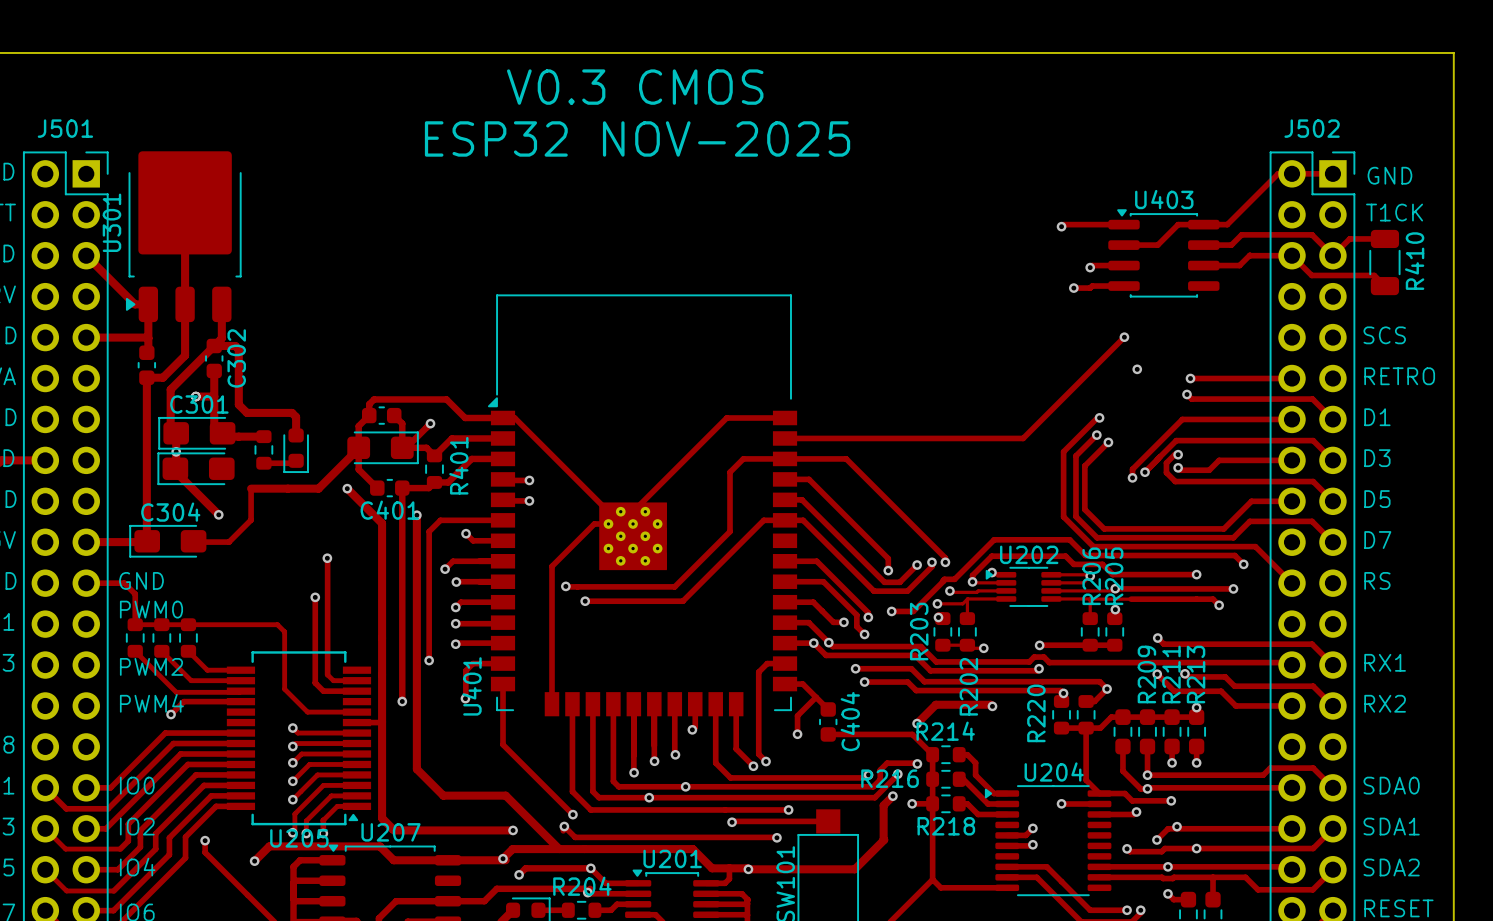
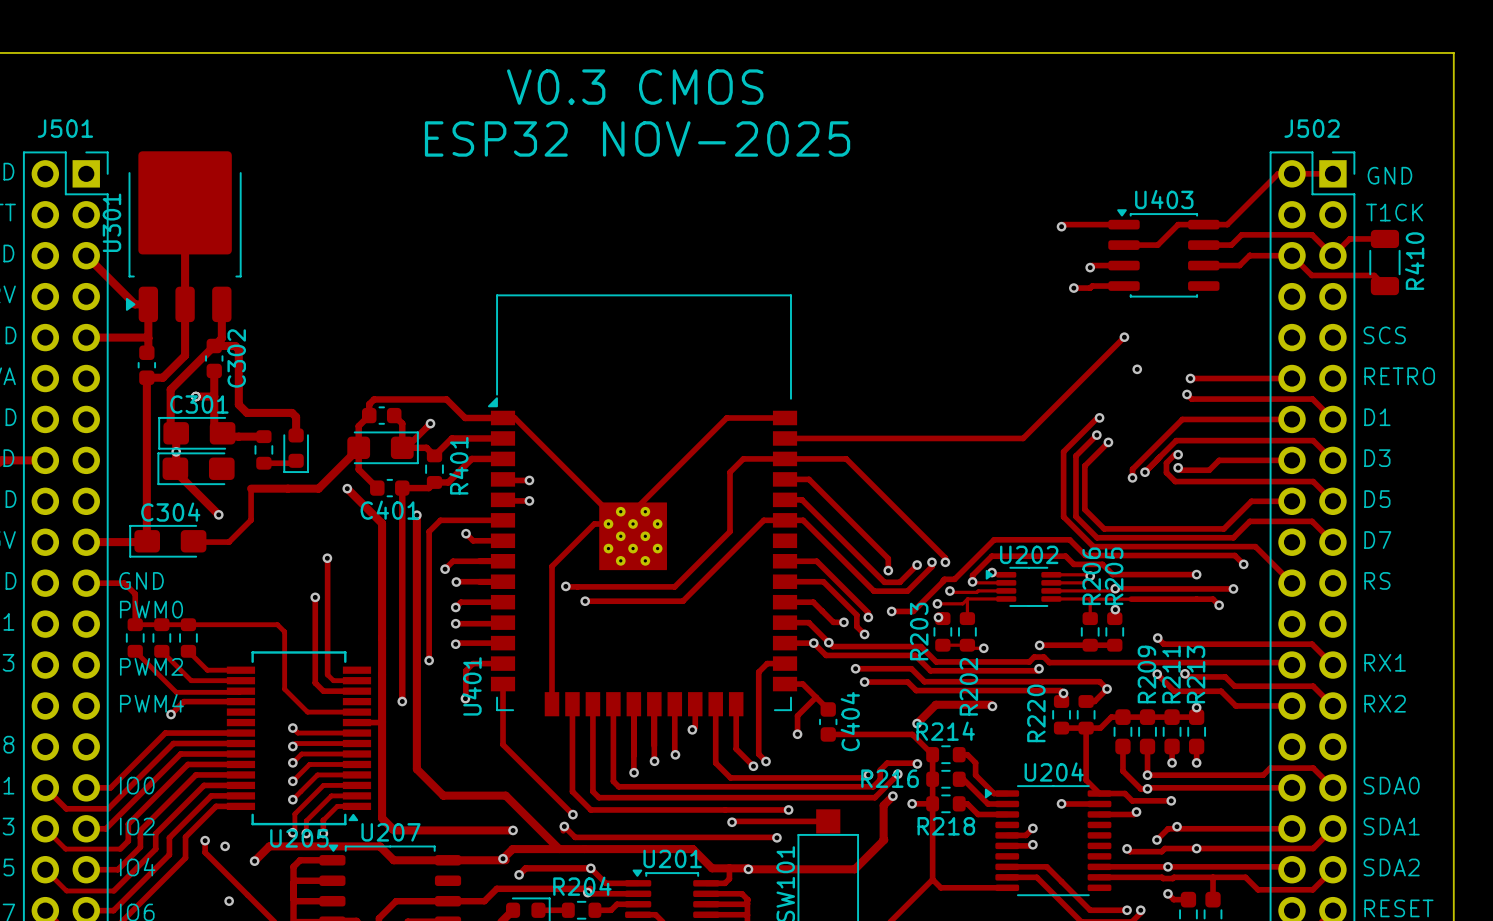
via: (685, 786) -> none
via: (649, 797) -> none
via: none -> (225, 846)
via: none -> (229, 901)

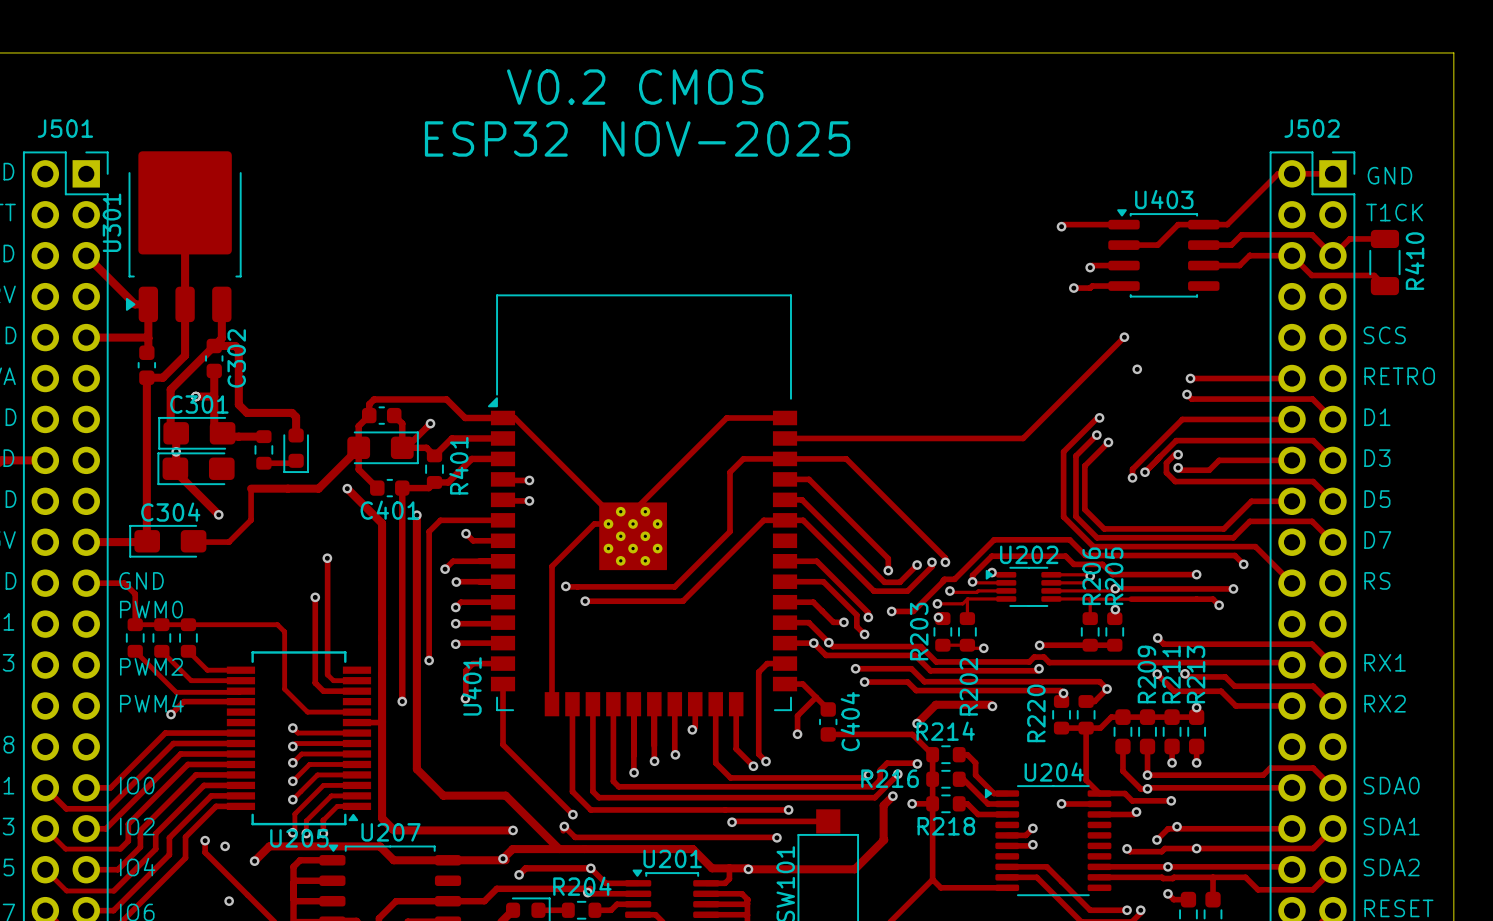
text: V0.3 CMOS (635, 87) -> V0.2 CMOS (635, 87)

